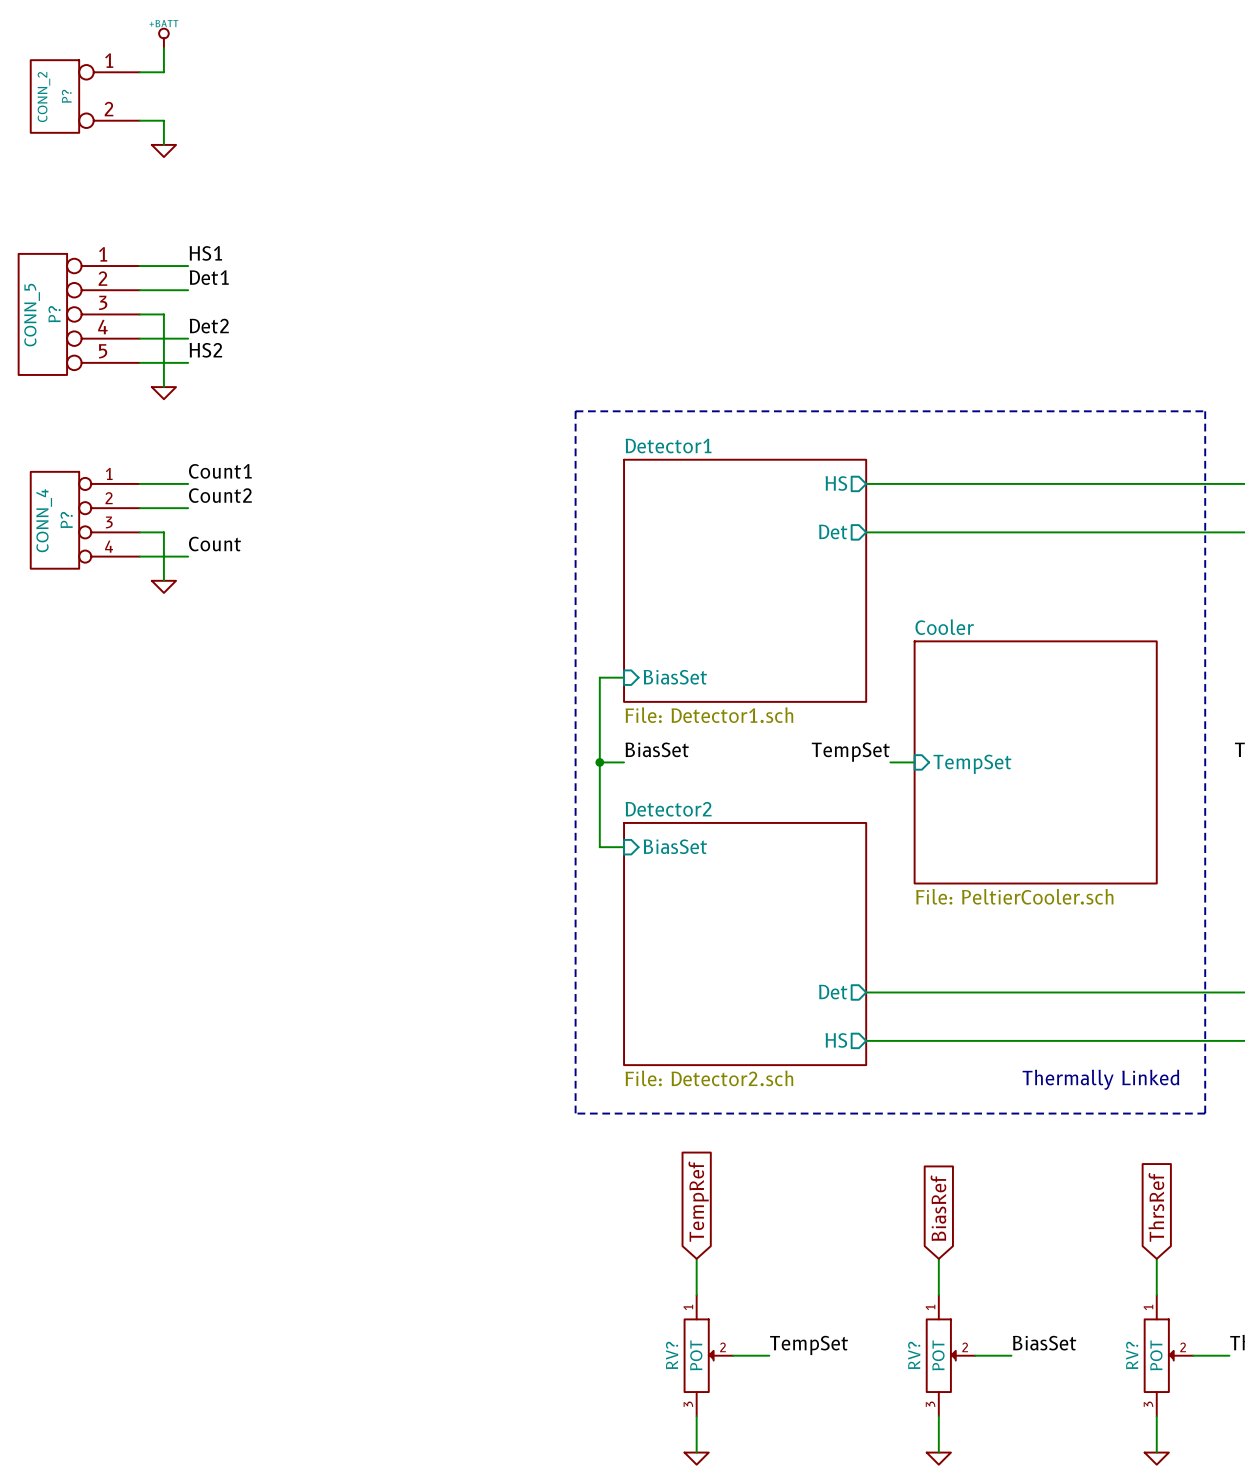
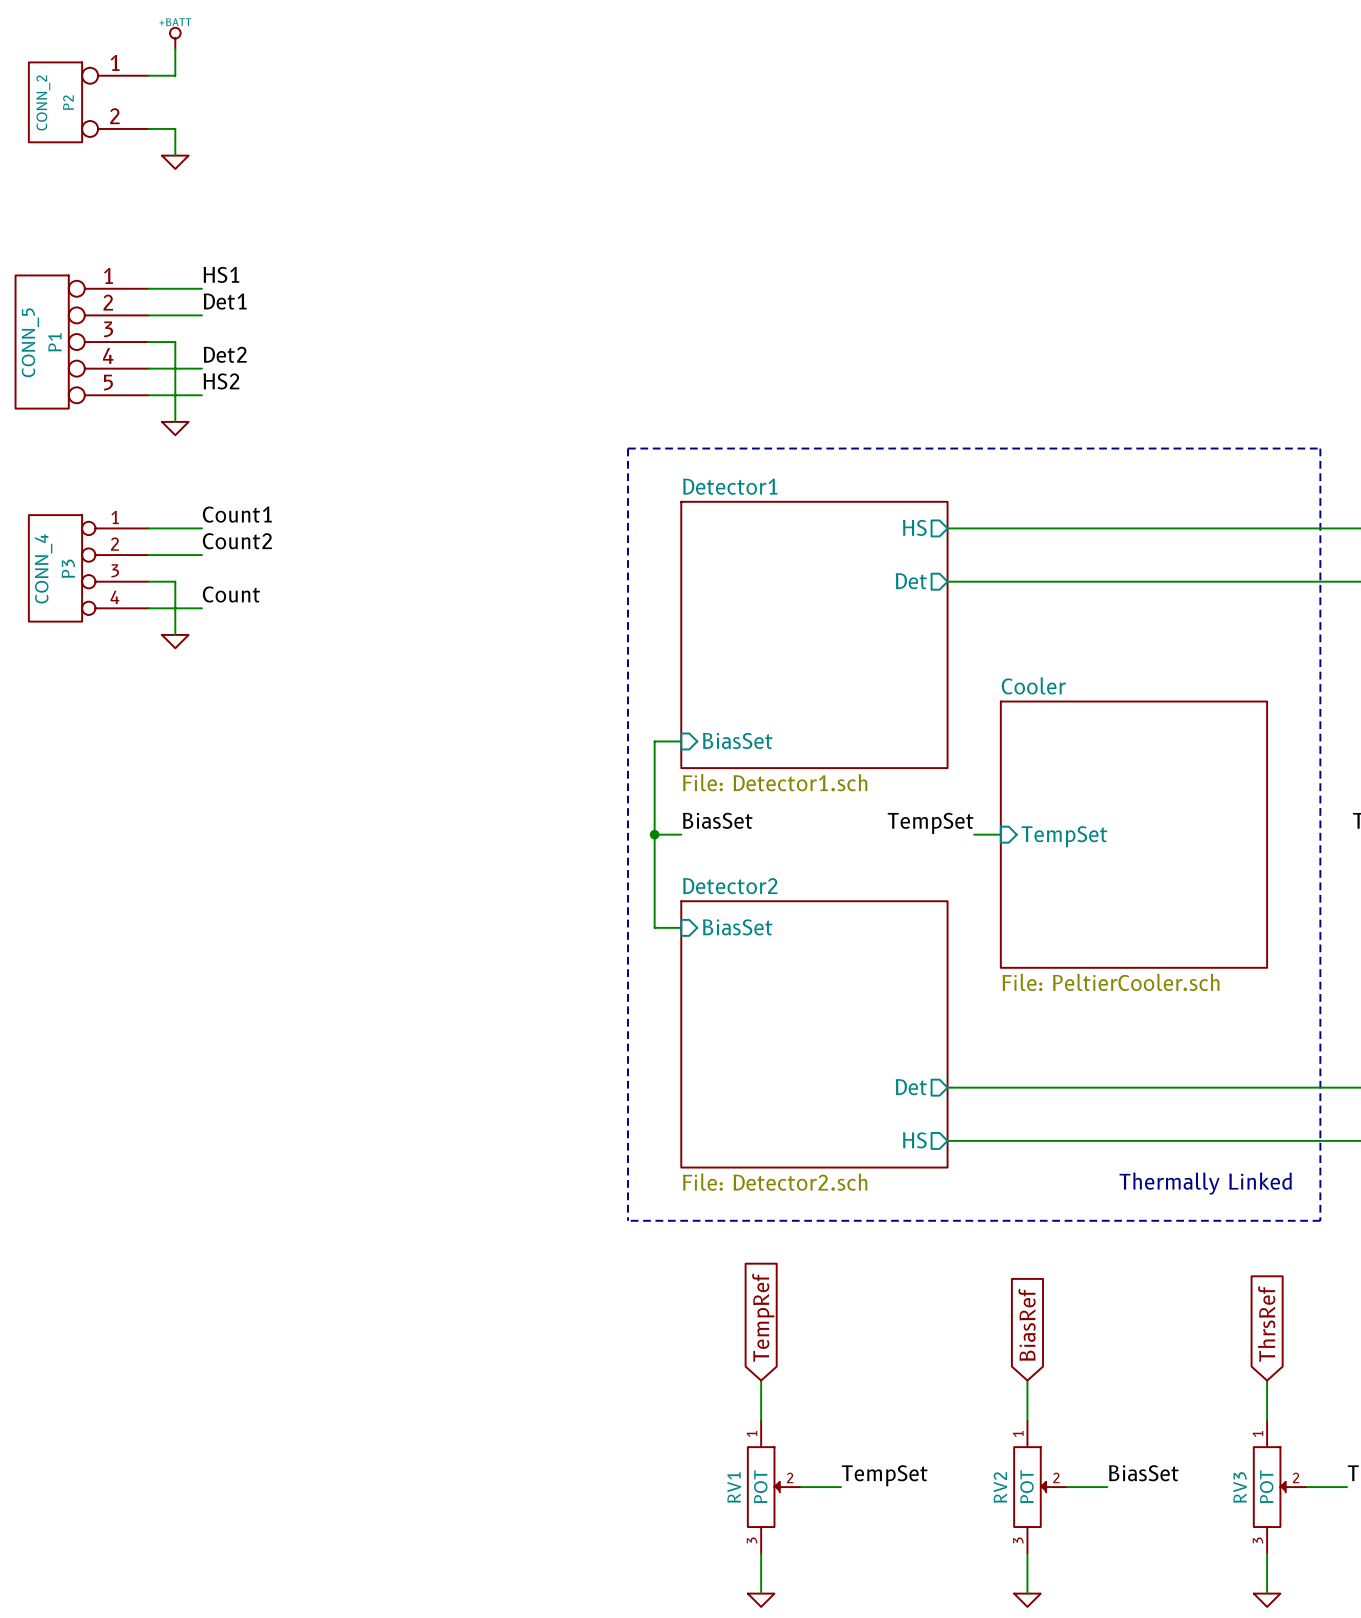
P? name: P? (66, 96) -> P2 (68, 102)
P? name: P? (54, 314) -> P1 (54, 342)
P? name: P? (66, 520) -> P3 (68, 568)
RV? name: RV? (672, 1355) -> RV1 (734, 1487)
RV? name: RV? (914, 1355) -> RV2 (1000, 1487)
RV? name: RV? (1132, 1355) -> RV3 (1240, 1487)

